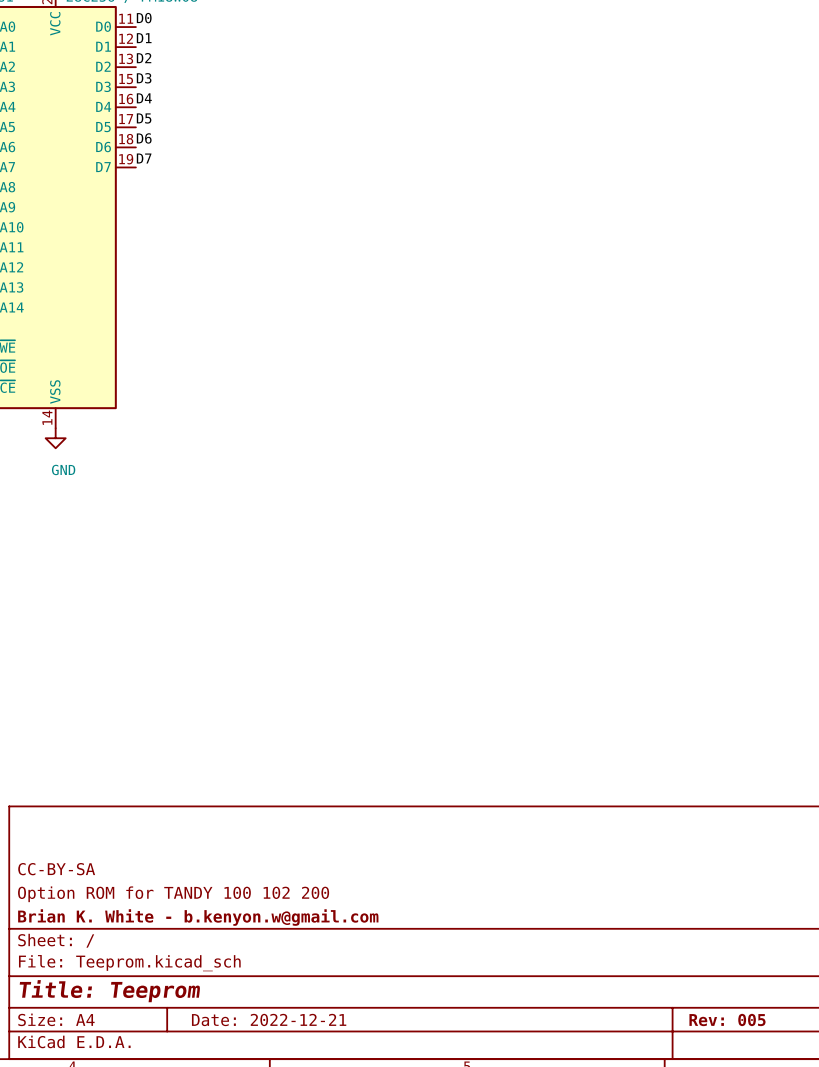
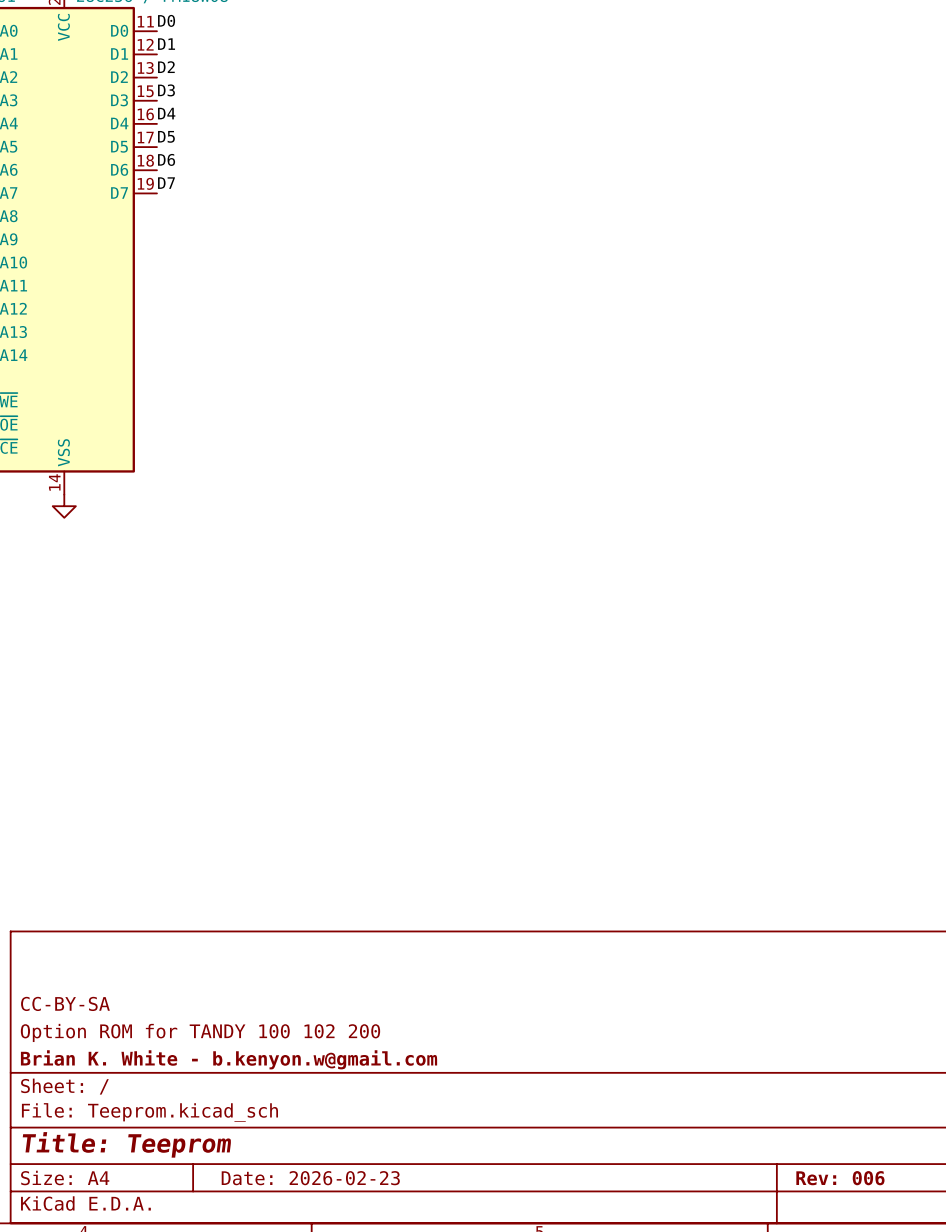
power symbol text: GND (63, 469) -> none
title block: Date: 2022-12-21 (269, 1019) -> Date: 2026-02-23 (310, 1178)
title block: Rev: 005 (727, 1019) -> Rev: 006 (840, 1178)

